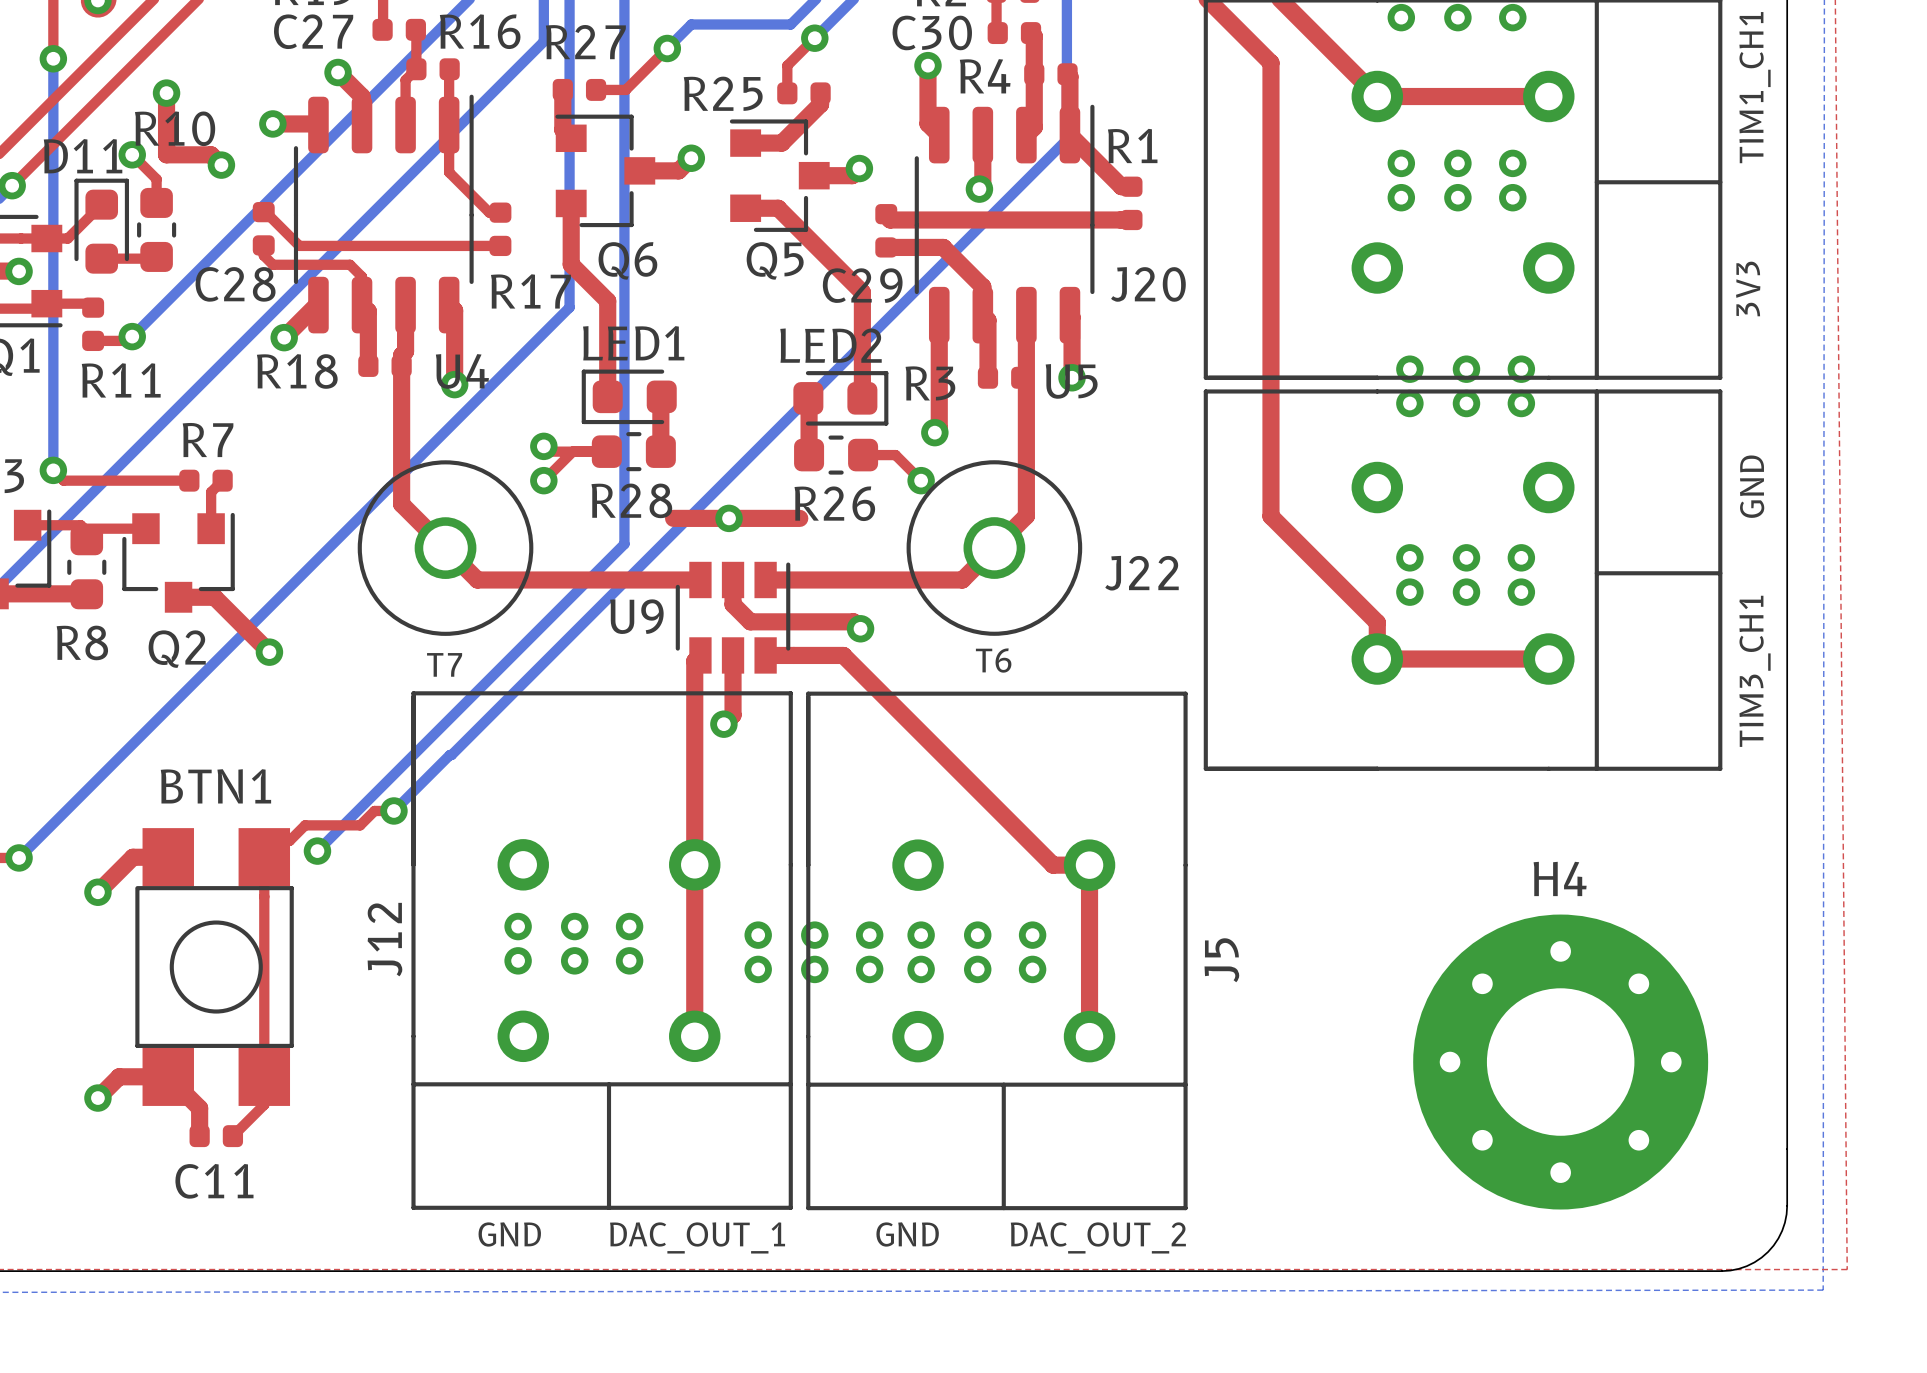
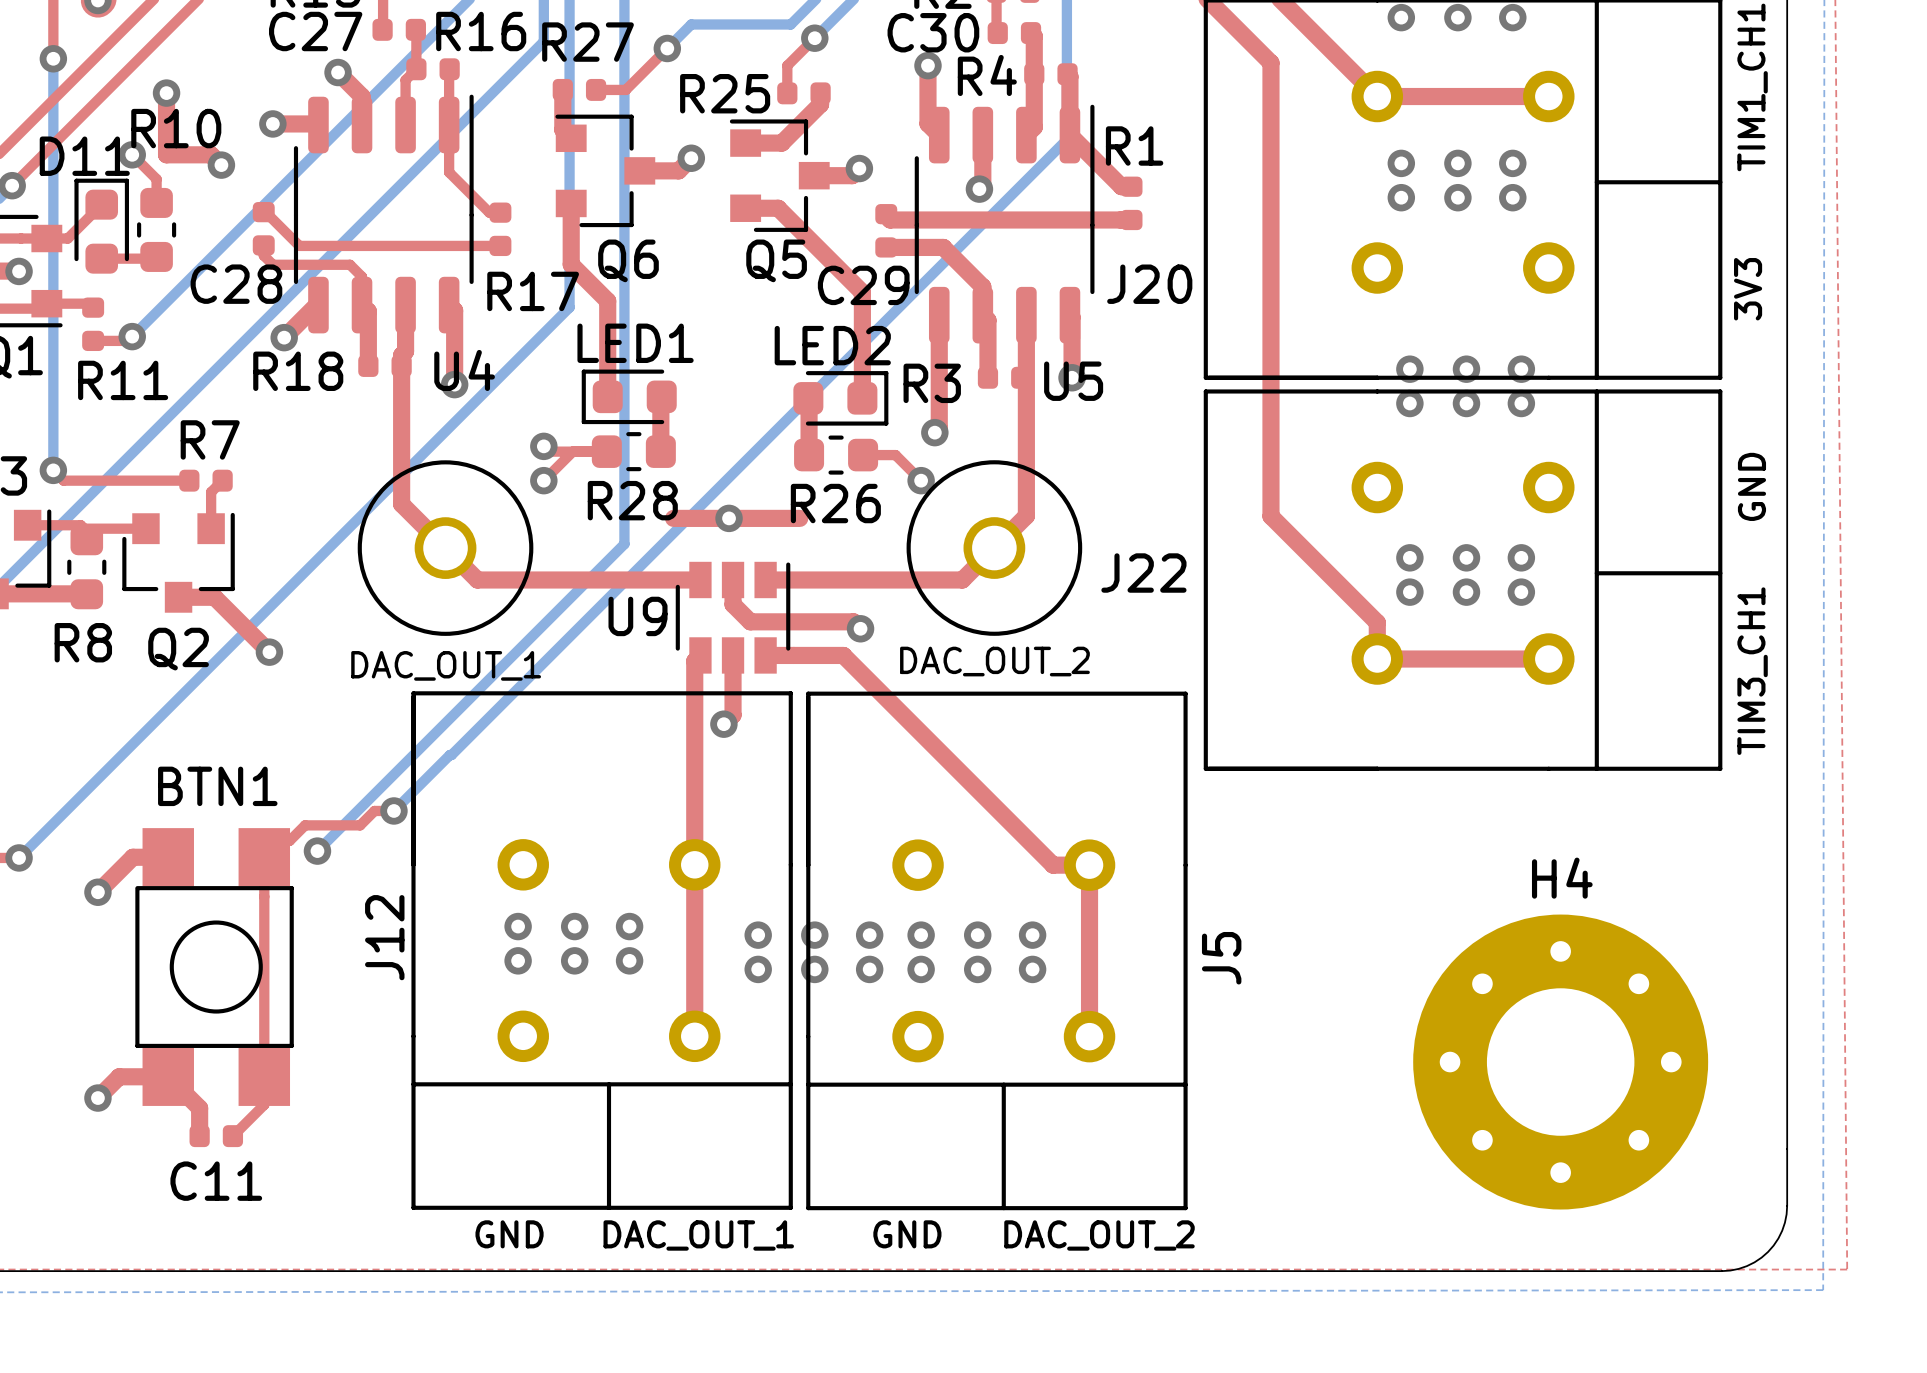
T6 name: T6 (993, 660) -> DAC_OUT_2 (994, 661)
T7 name: T7 (444, 664) -> DAC_OUT_1 (446, 665)

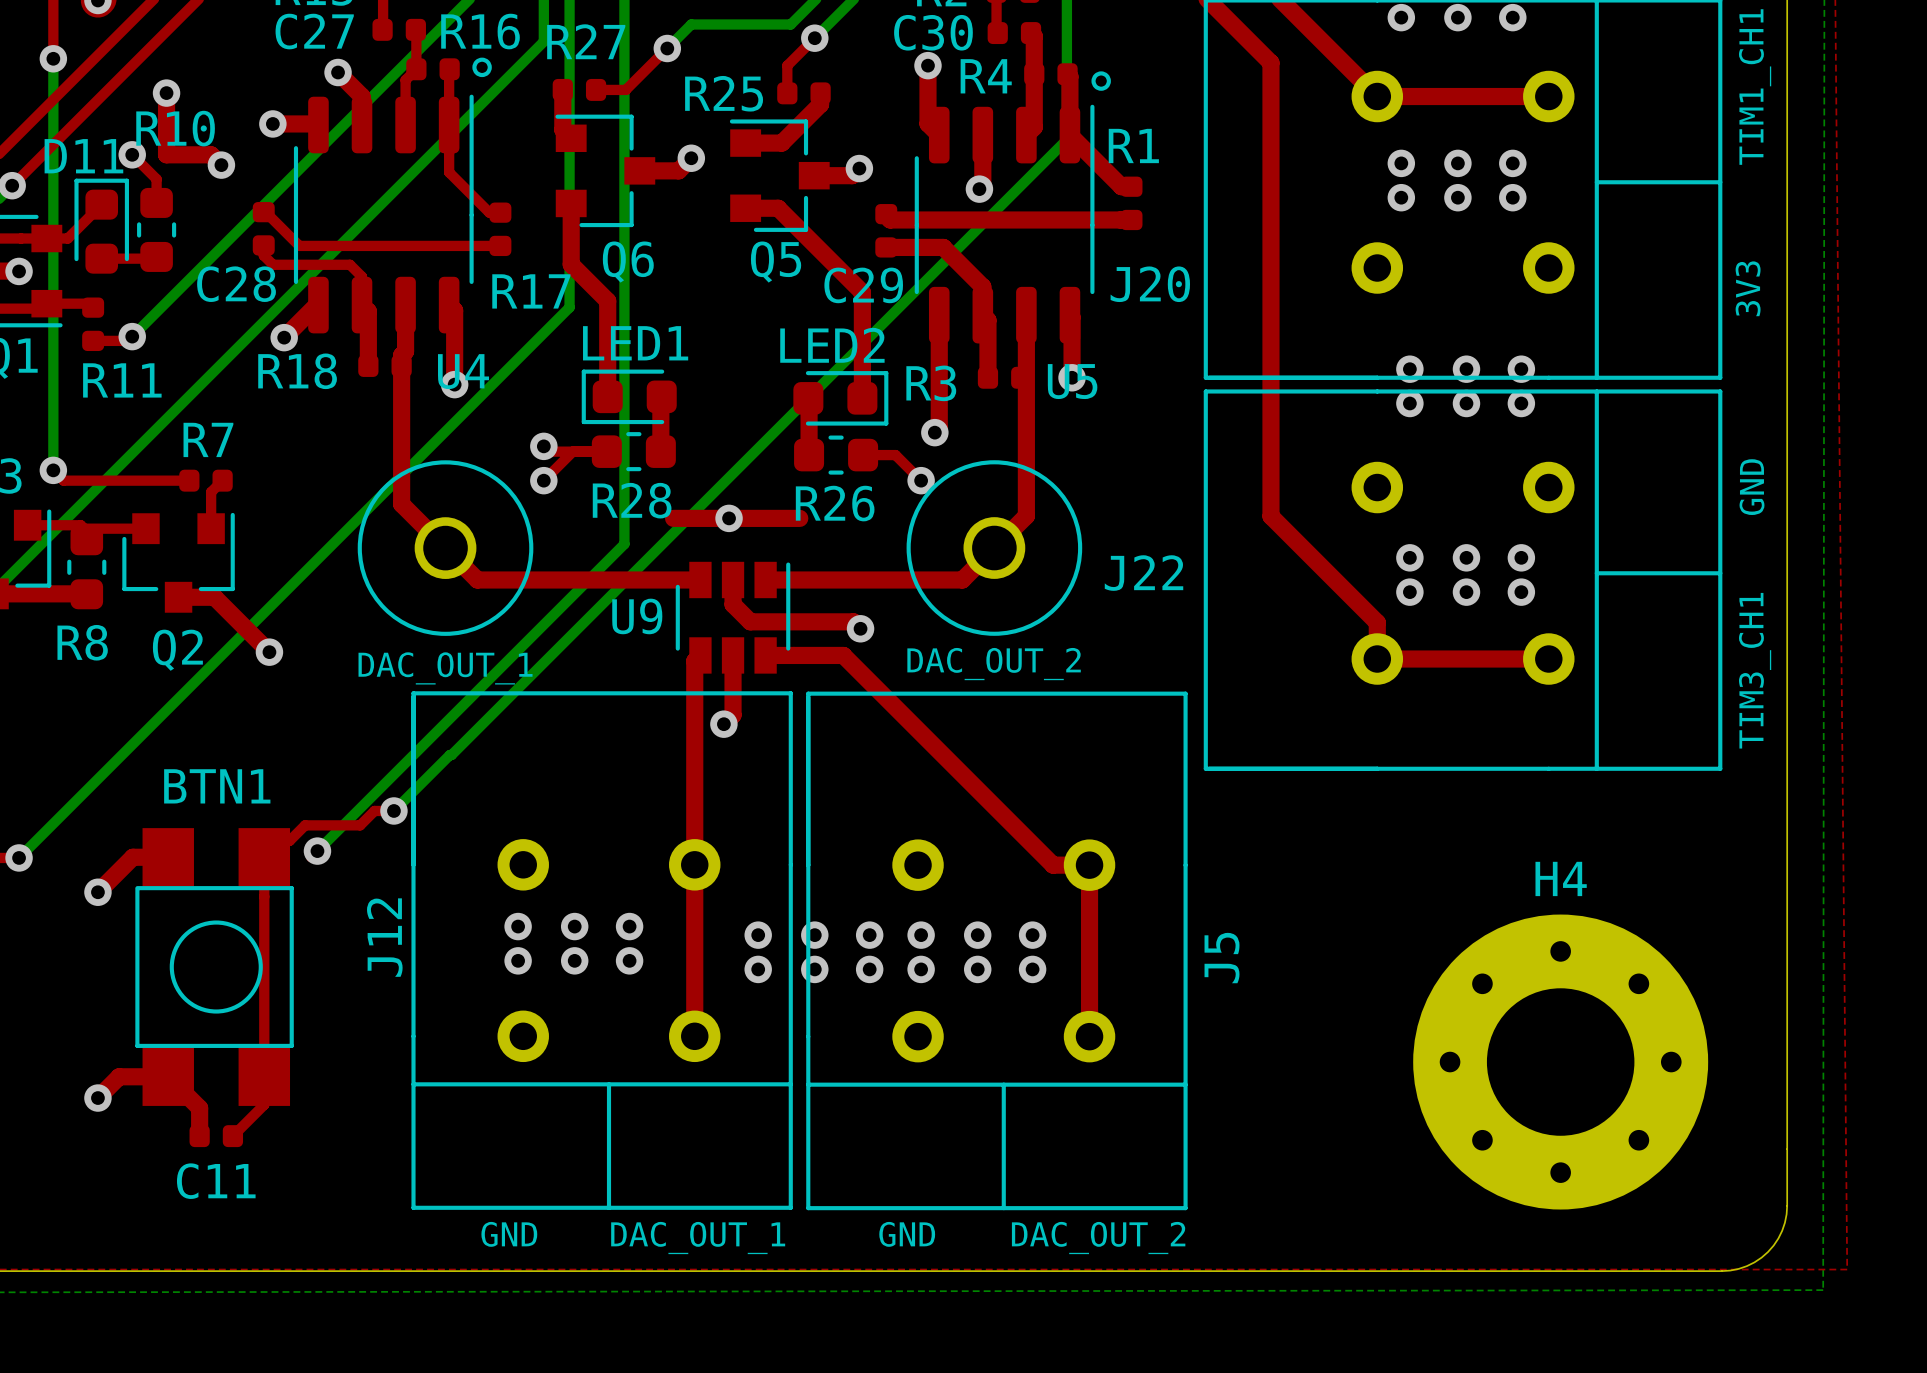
drawing: none -> [470, 57, 495, 83]
drawing: none -> [1090, 70, 1115, 95]

